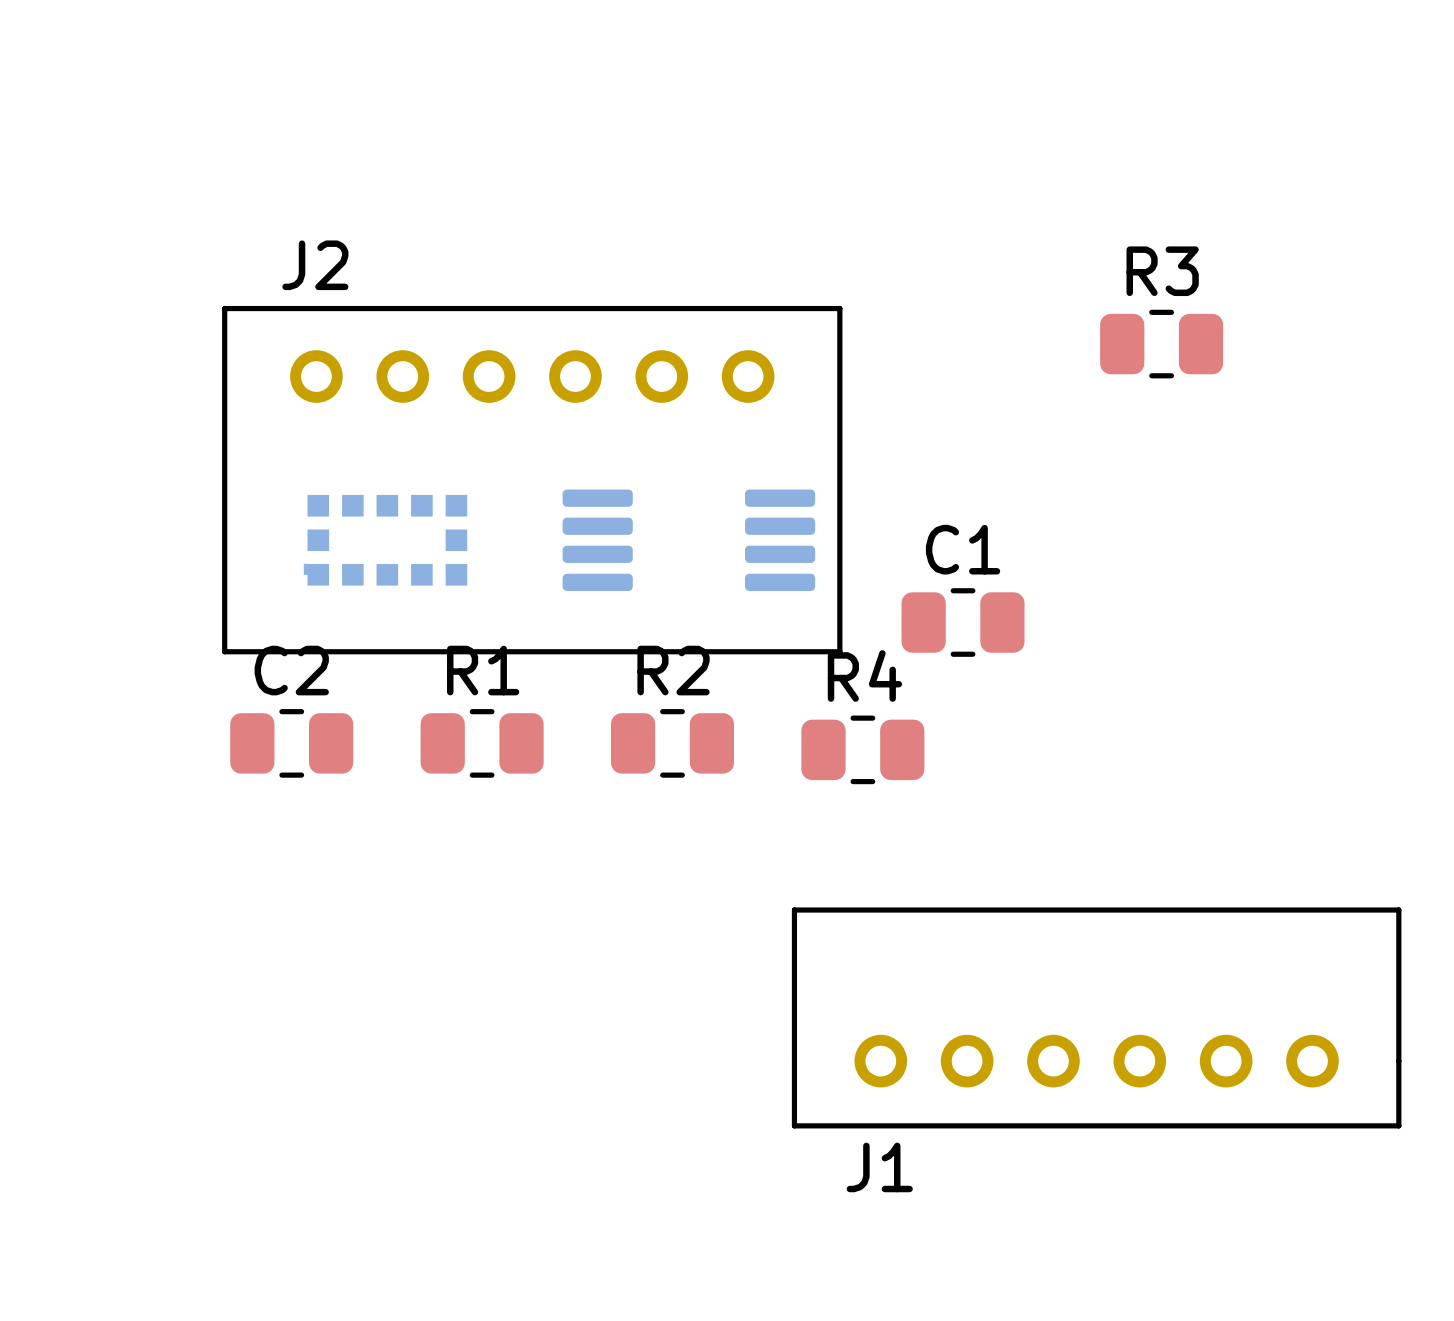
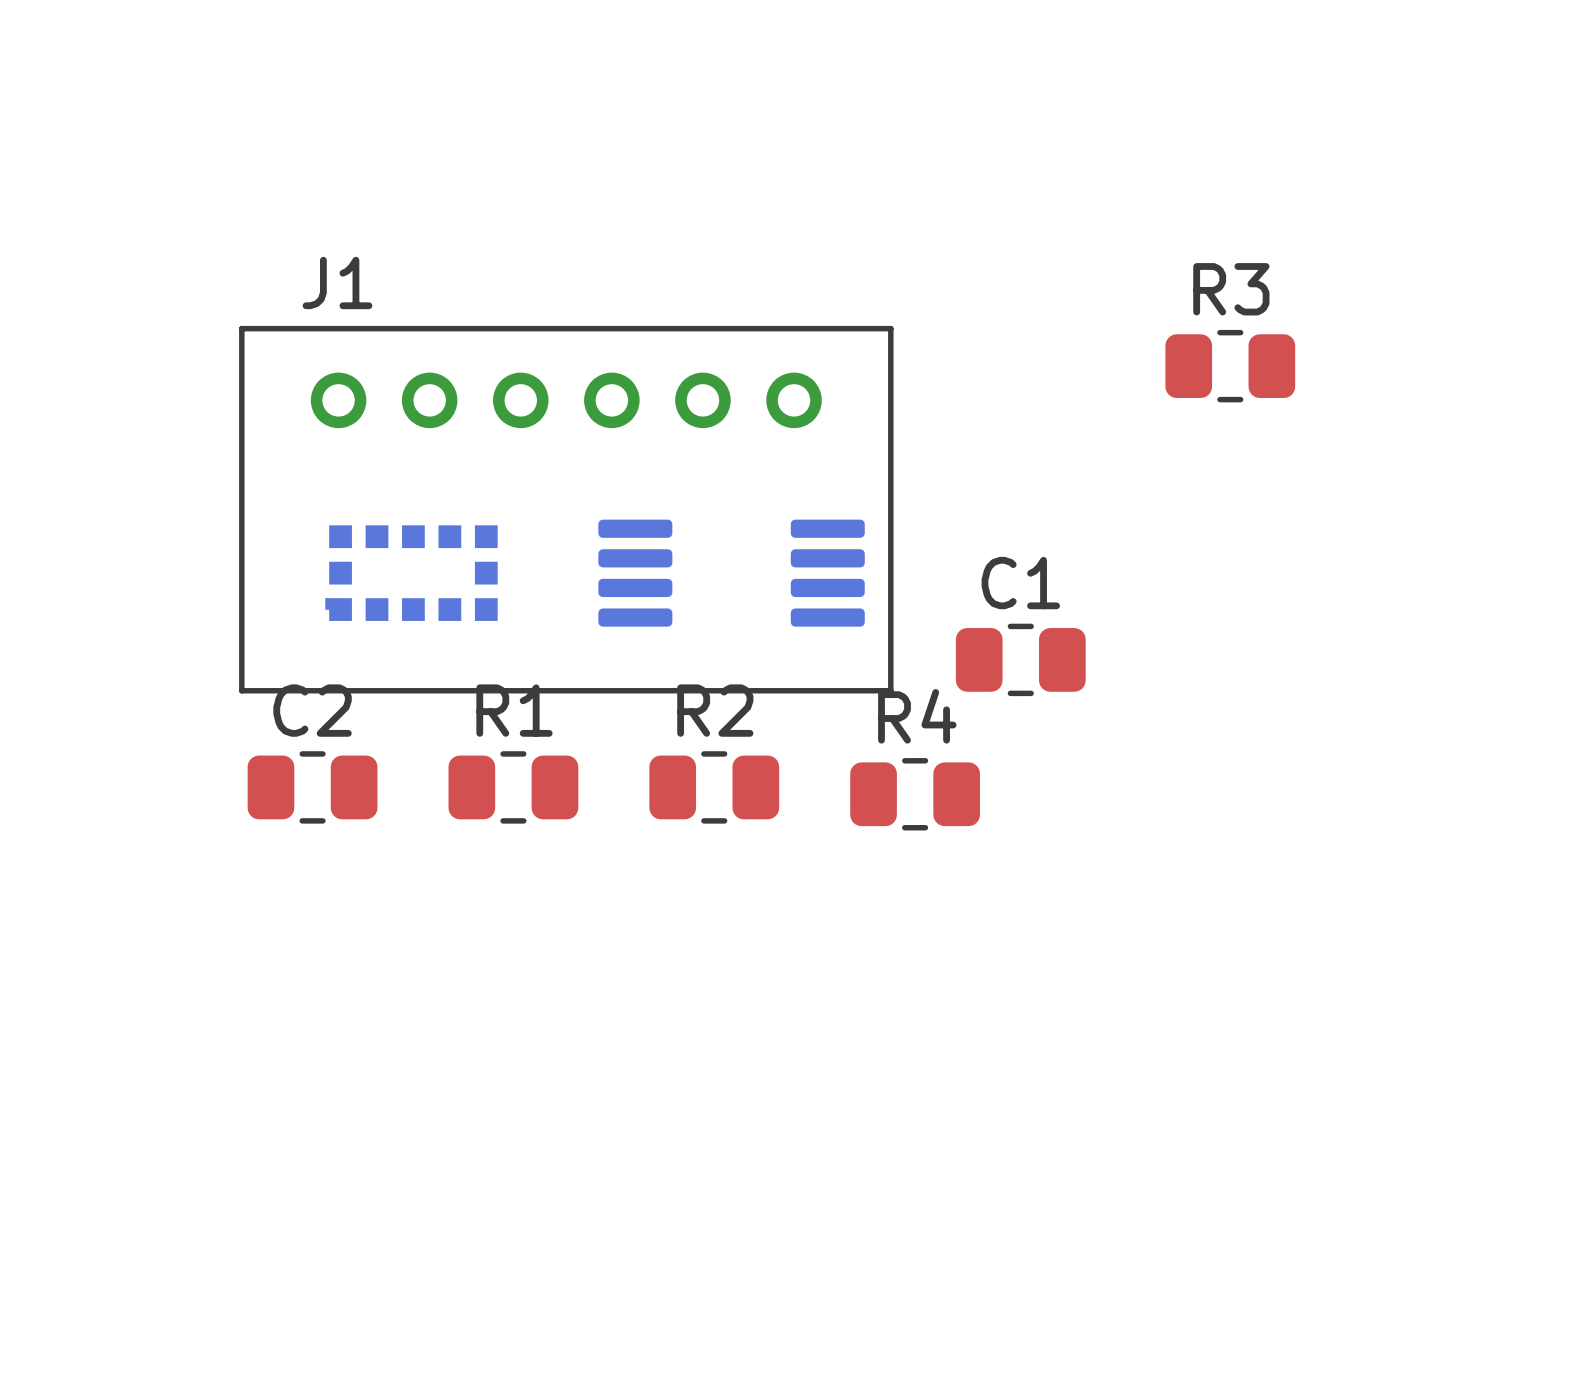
J2 name: J2 (315, 265) -> J1 (337, 282)
J1: (1096, 1017) -> none

